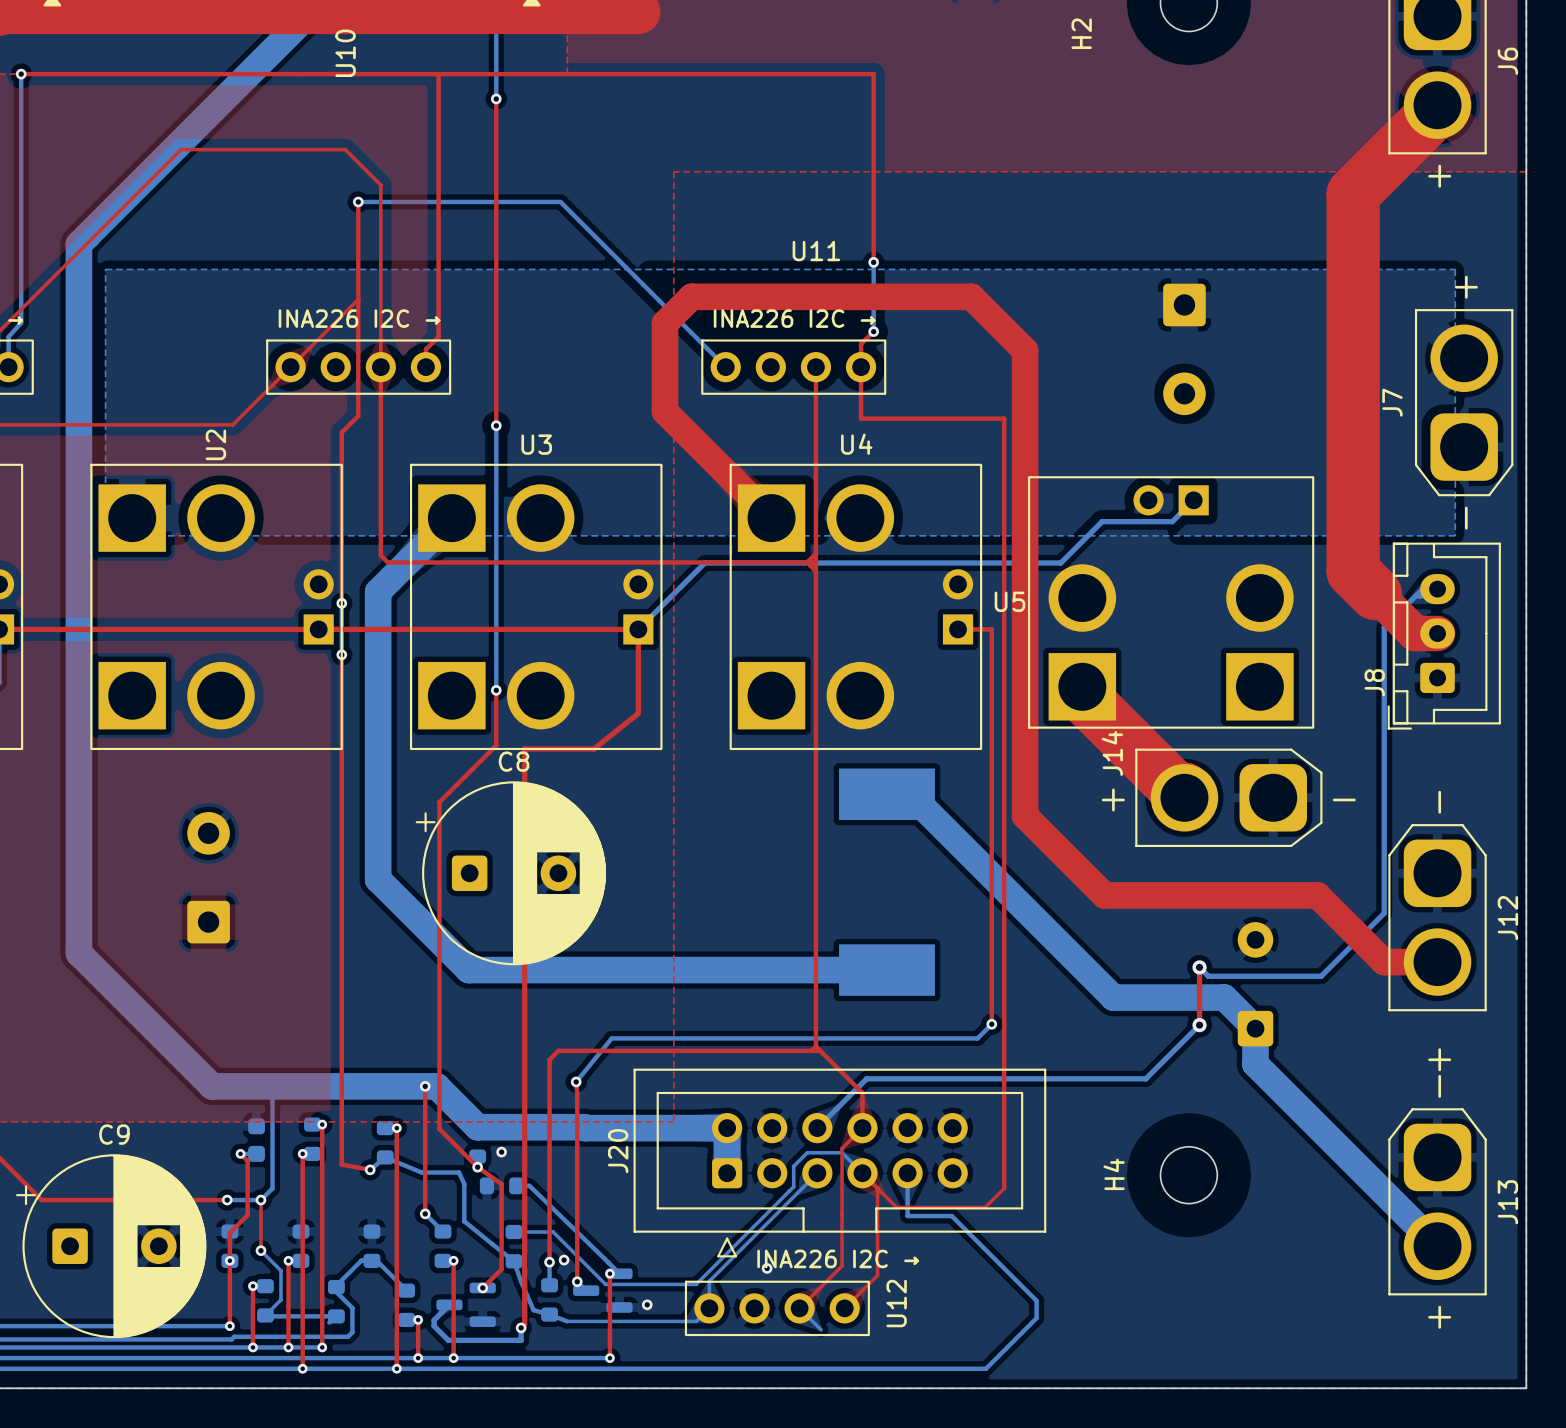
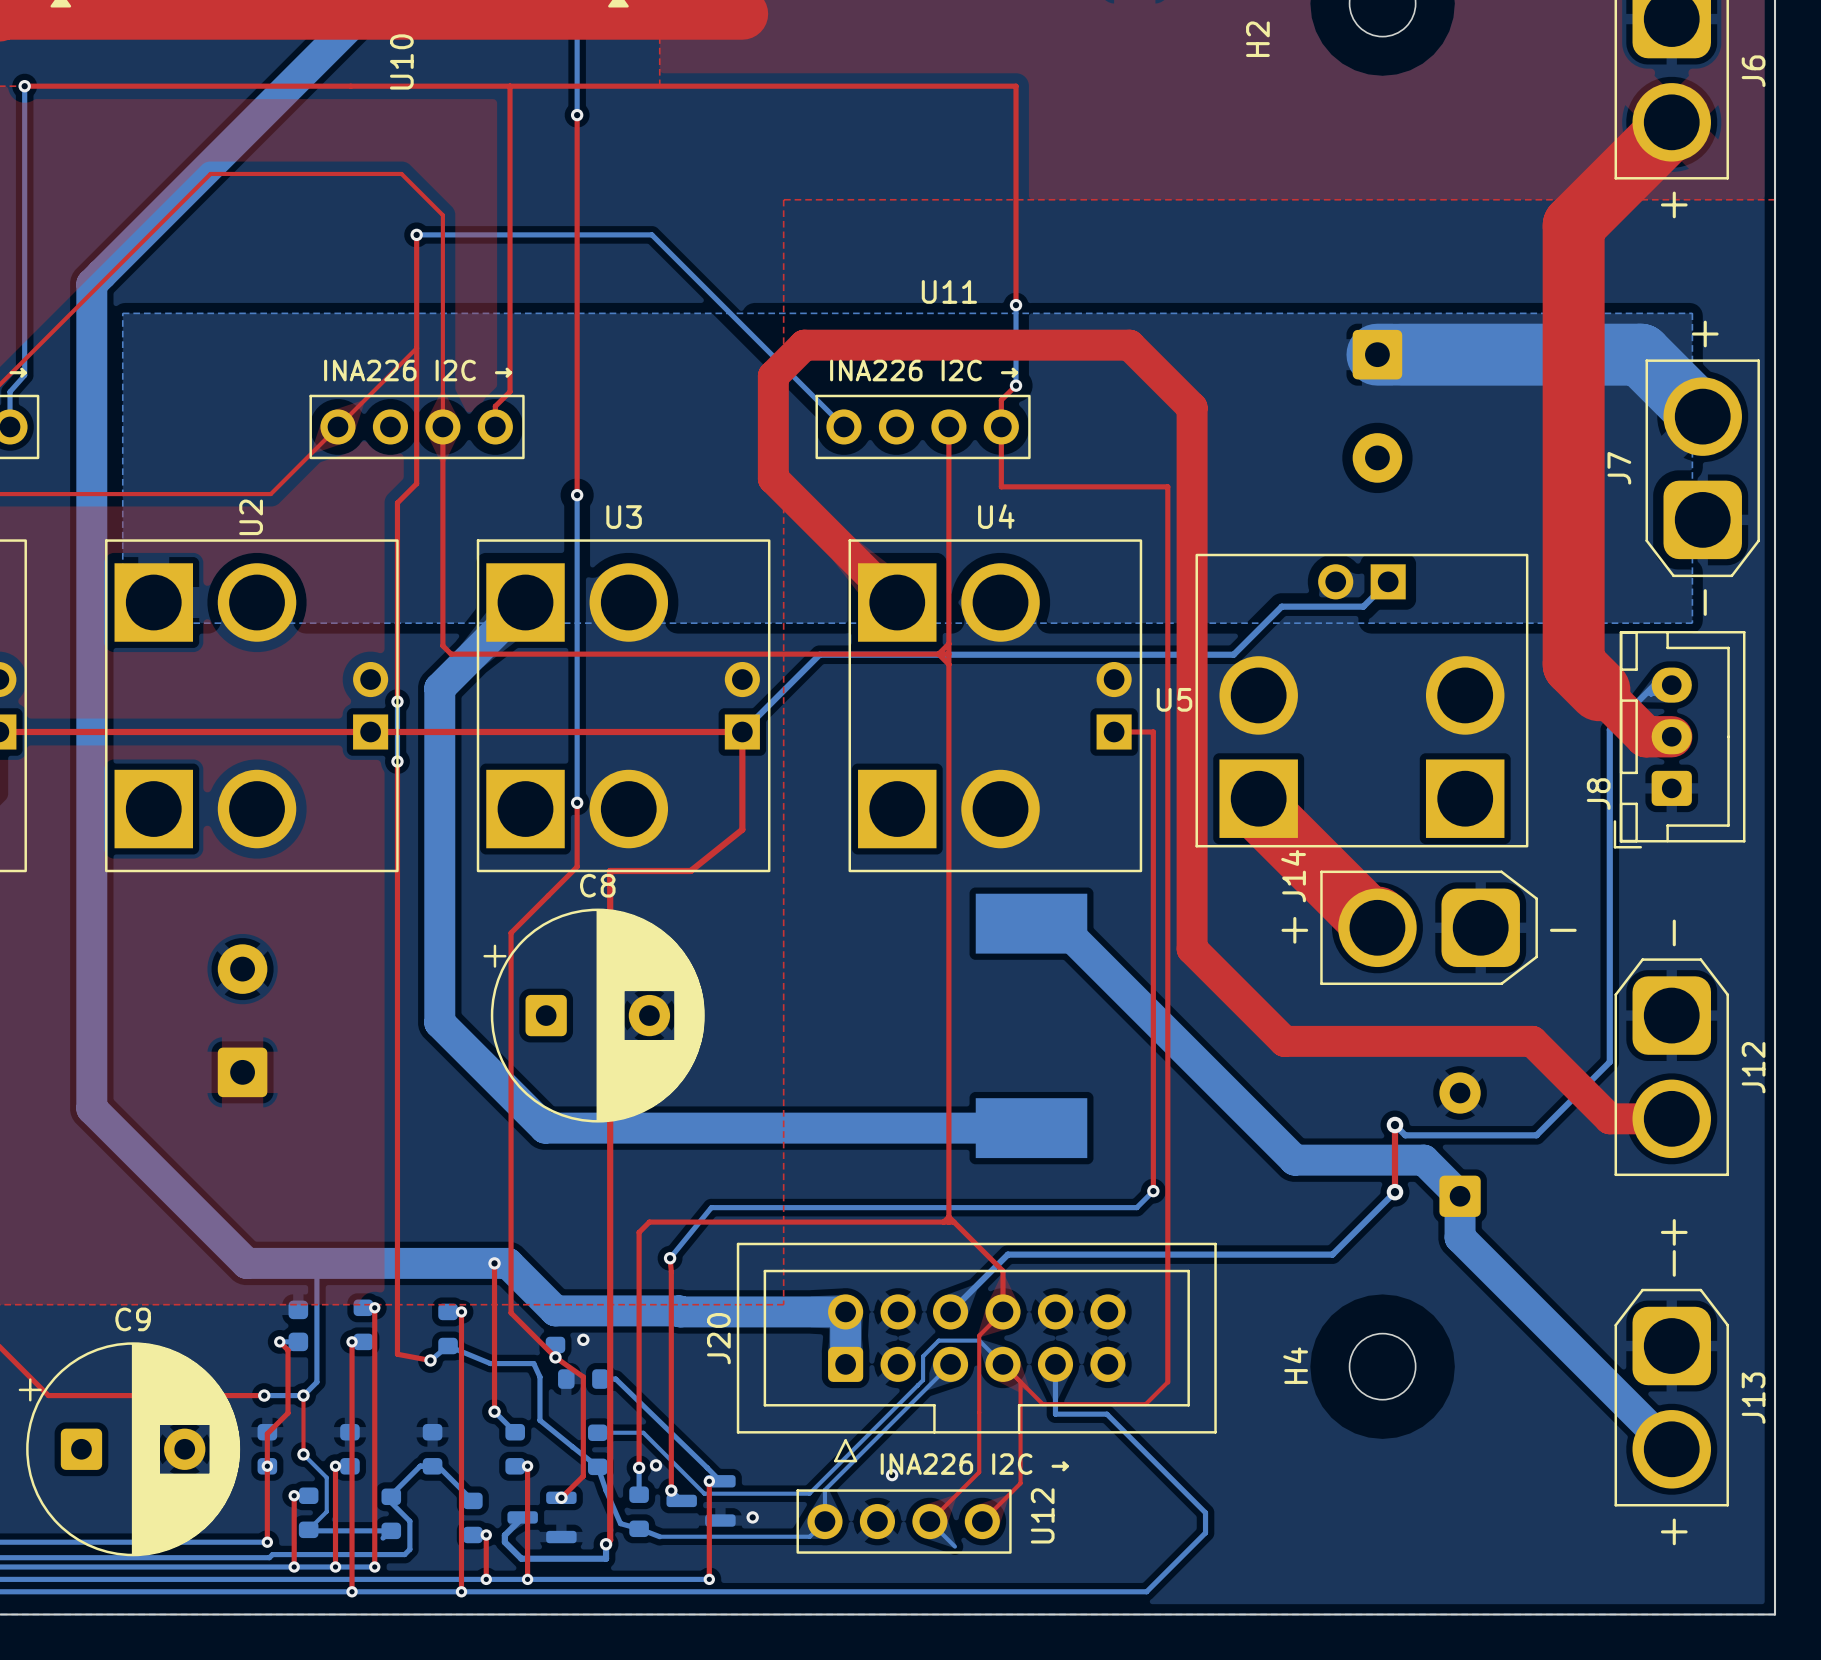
bottom track: none -> (1377, 354) (1640, 354) (1702, 416)

